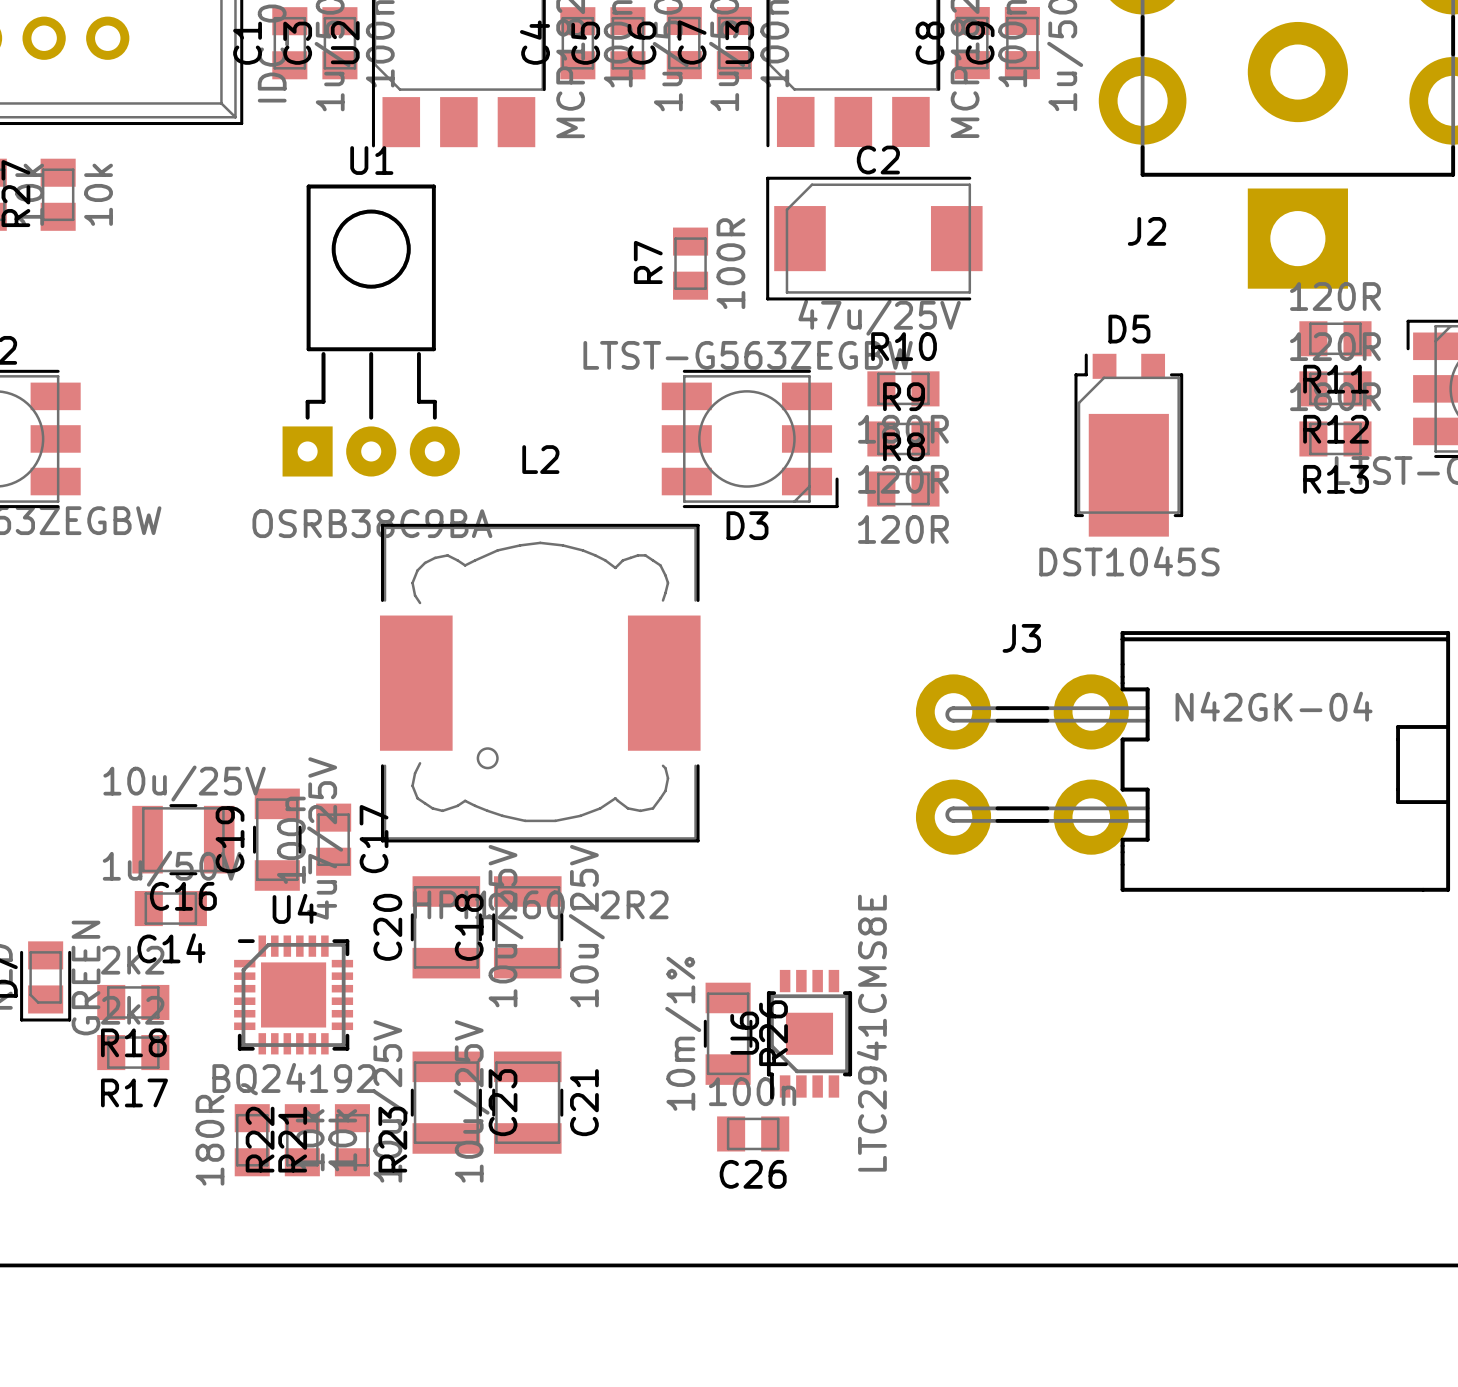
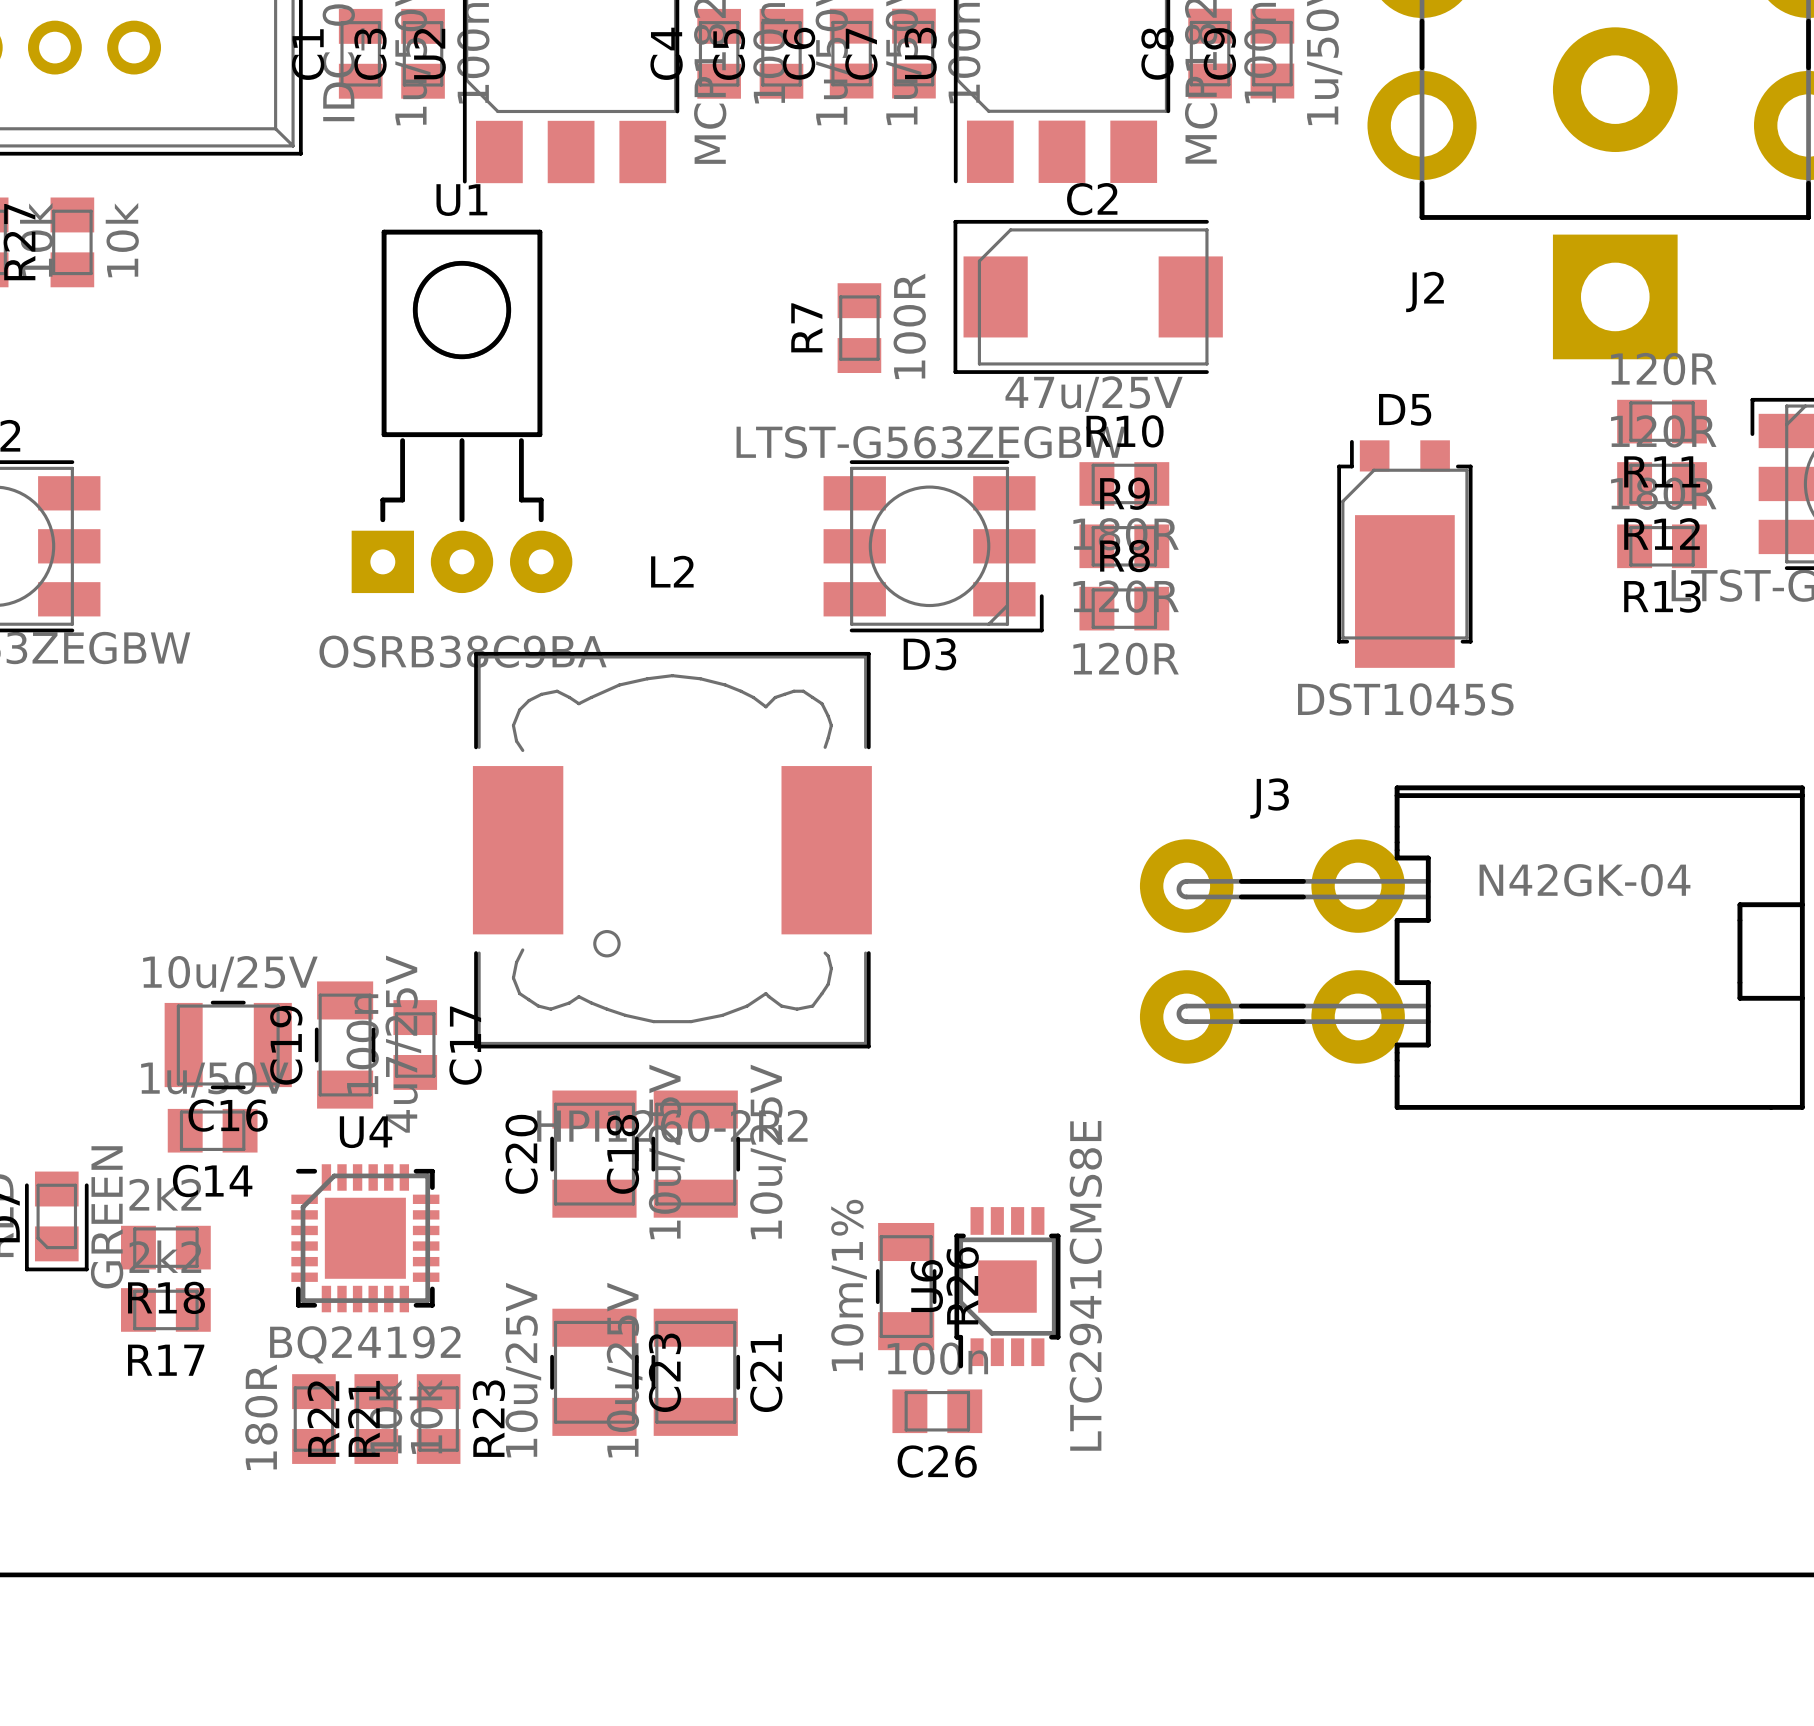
C20 position: (446, 927) -> (594, 1154)
C18 position: (527, 927) -> (695, 1154)
C23 position: (446, 1102) -> (594, 1372)
C21 position: (527, 1102) -> (695, 1372)

